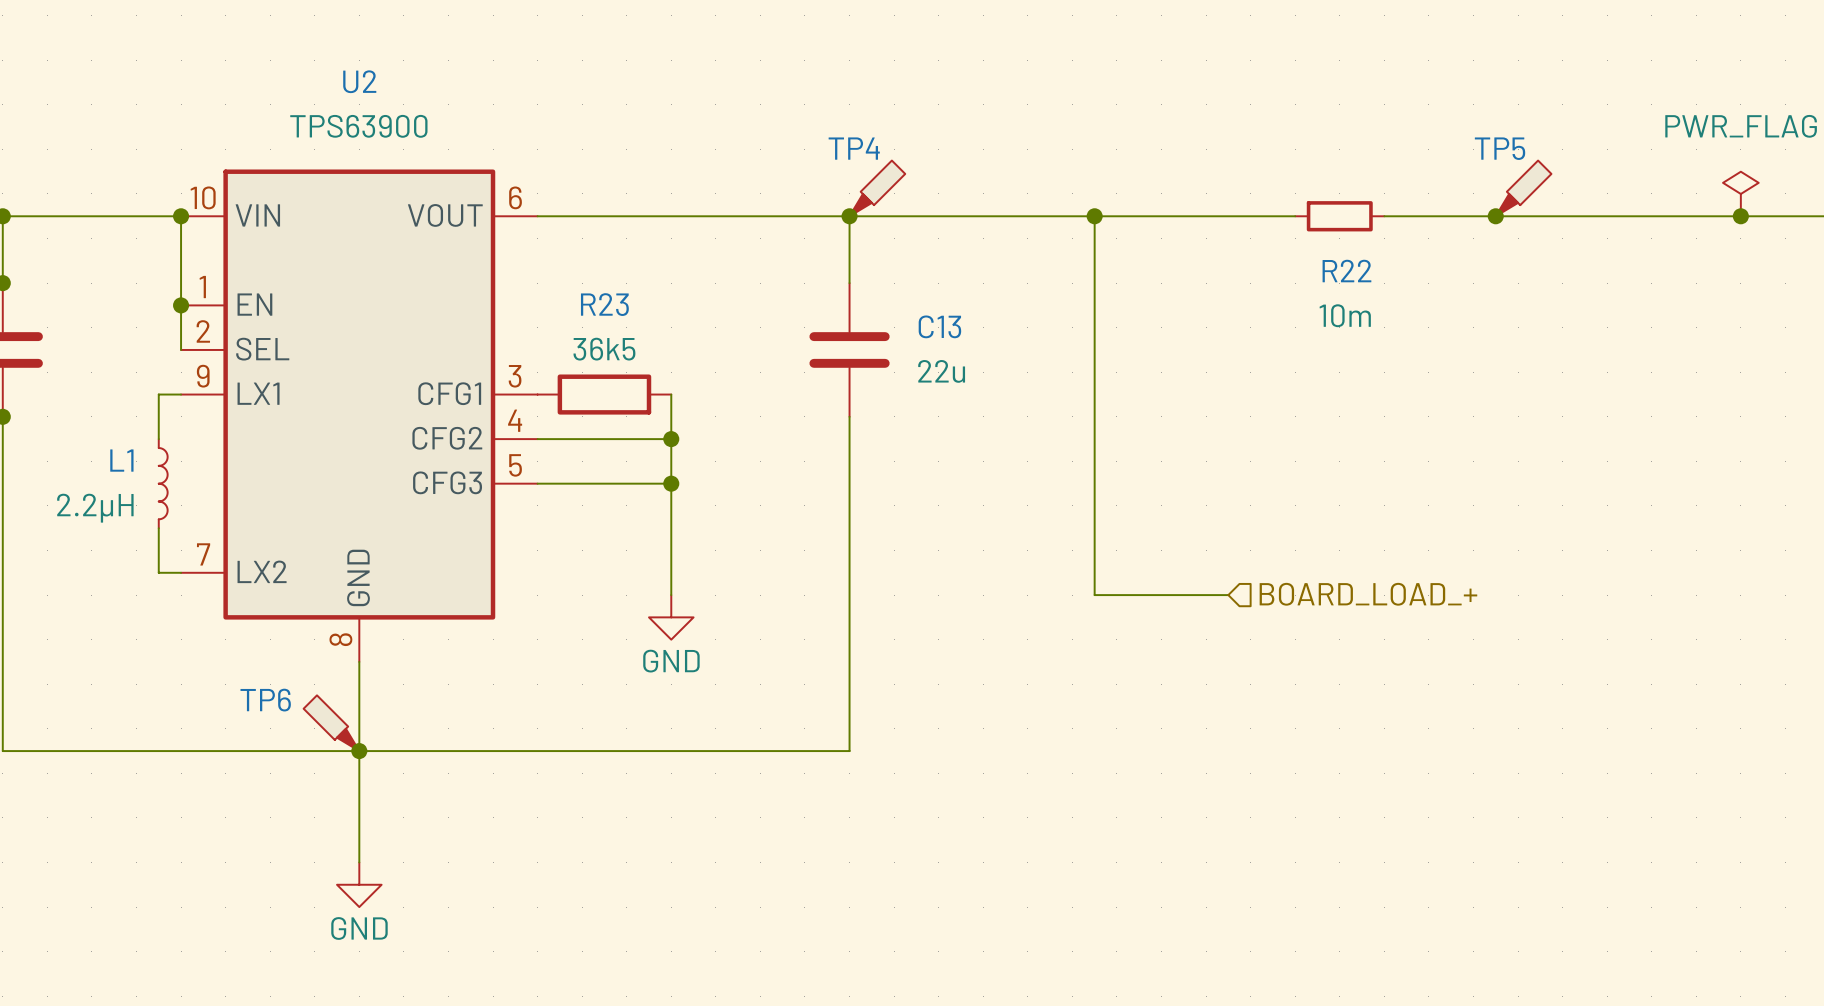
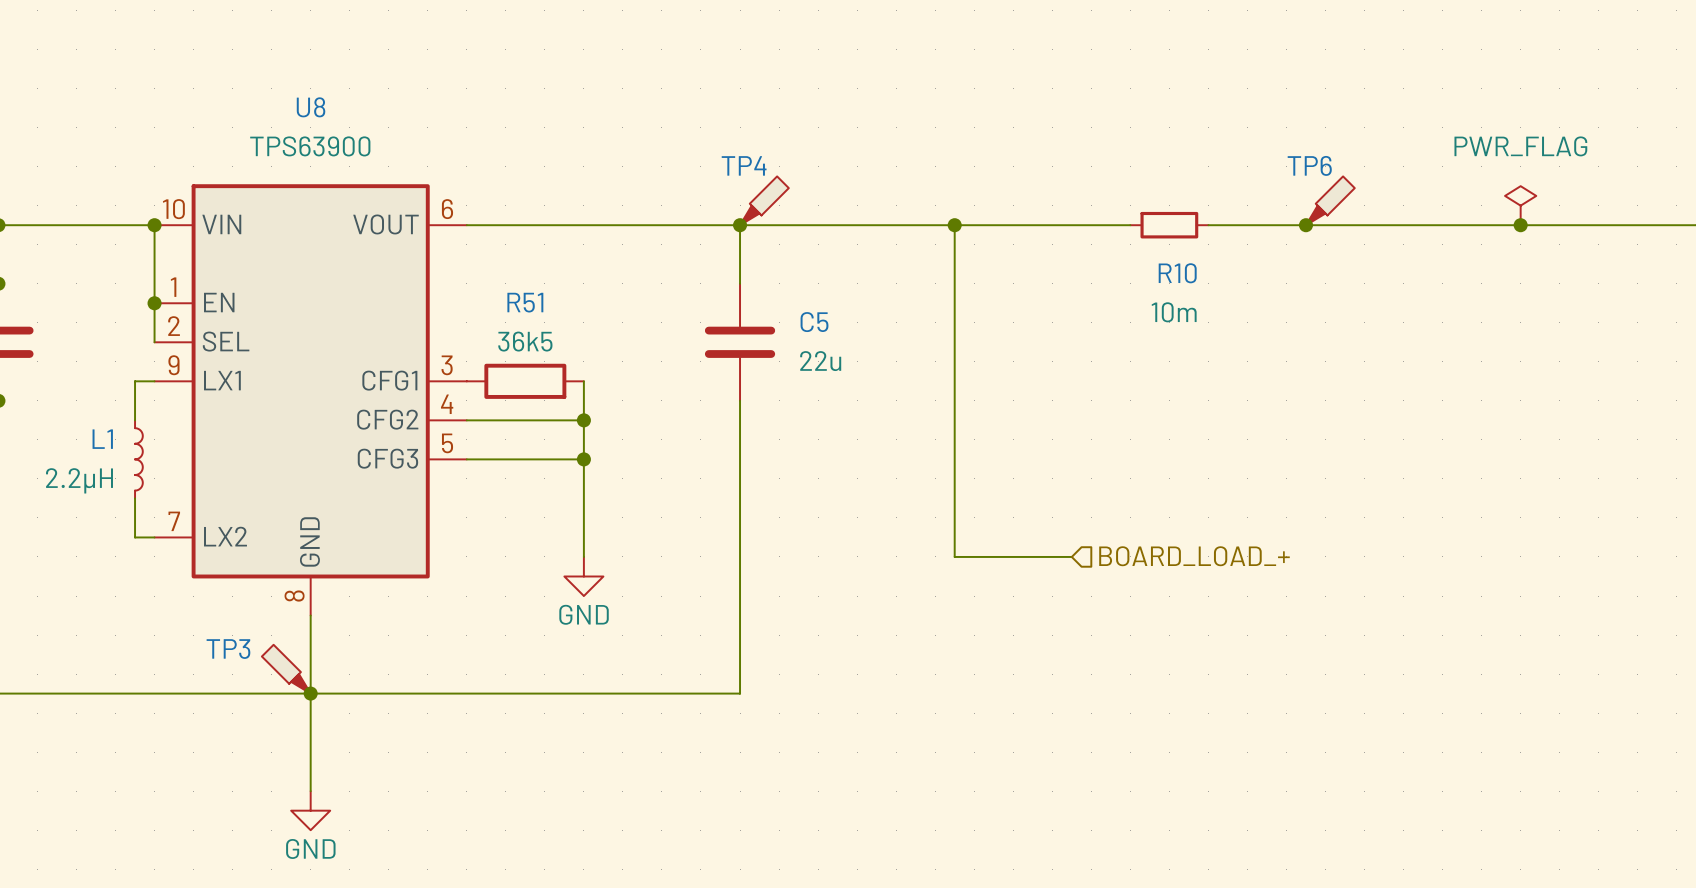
U2 name: U2 (359, 81) -> U8 (311, 107)
TP5 name: TP5 (1500, 148) -> TP6 (1309, 165)
R22 name: R22 (1346, 271) -> R10 (1177, 273)
R23 name: R23 (604, 304) -> R51 (525, 302)
C13 name: C13 (939, 326) -> C5 (814, 322)
TP6 name: TP6 (265, 700) -> TP3 (228, 649)

